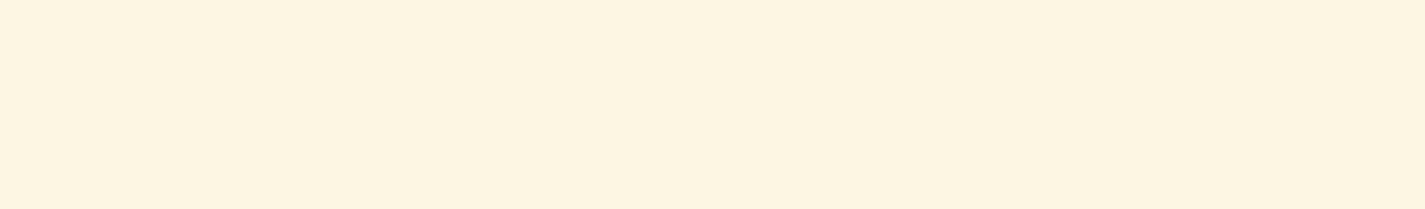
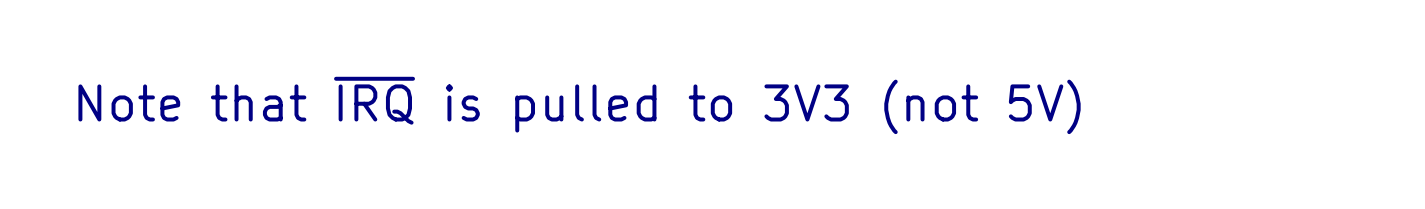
text: none -> Note that ~{IRQ} is pulled to 3V3 (not 5V) (579, 105)

